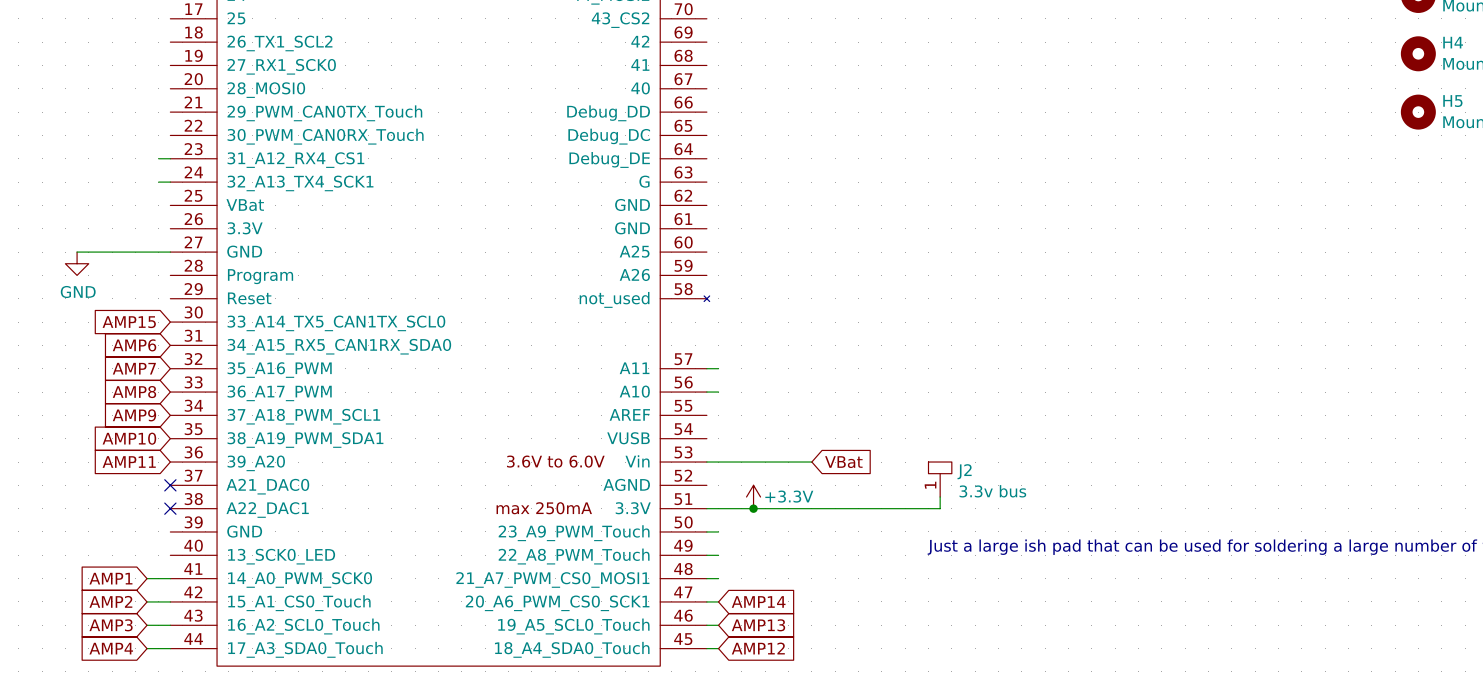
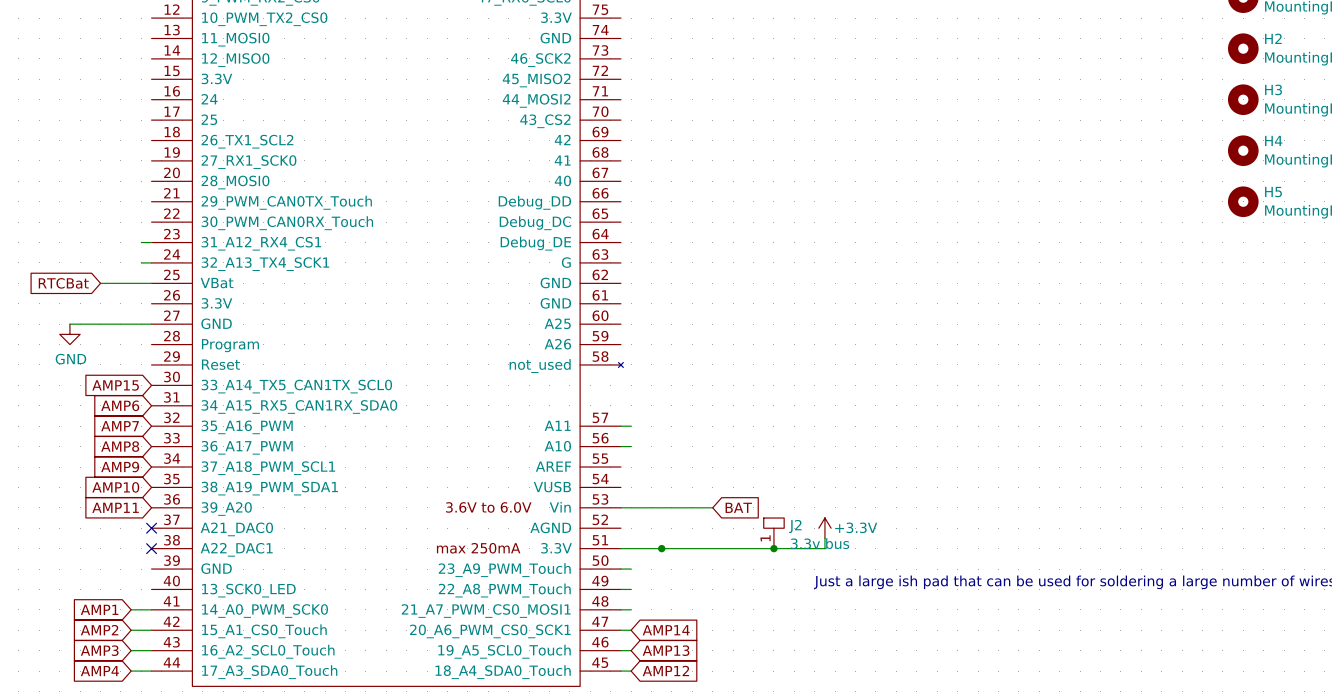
global label: none -> RTCBat (63, 283)
wire: none -> (100, 283) (151, 283)
global label: VBat (843, 462) -> BAT (738, 507)
J2 position: (940, 479) -> (773, 533)
power symbol position: +3.3V (753, 497) -> +3.3V (824, 528)
junction: none -> (773, 548)

